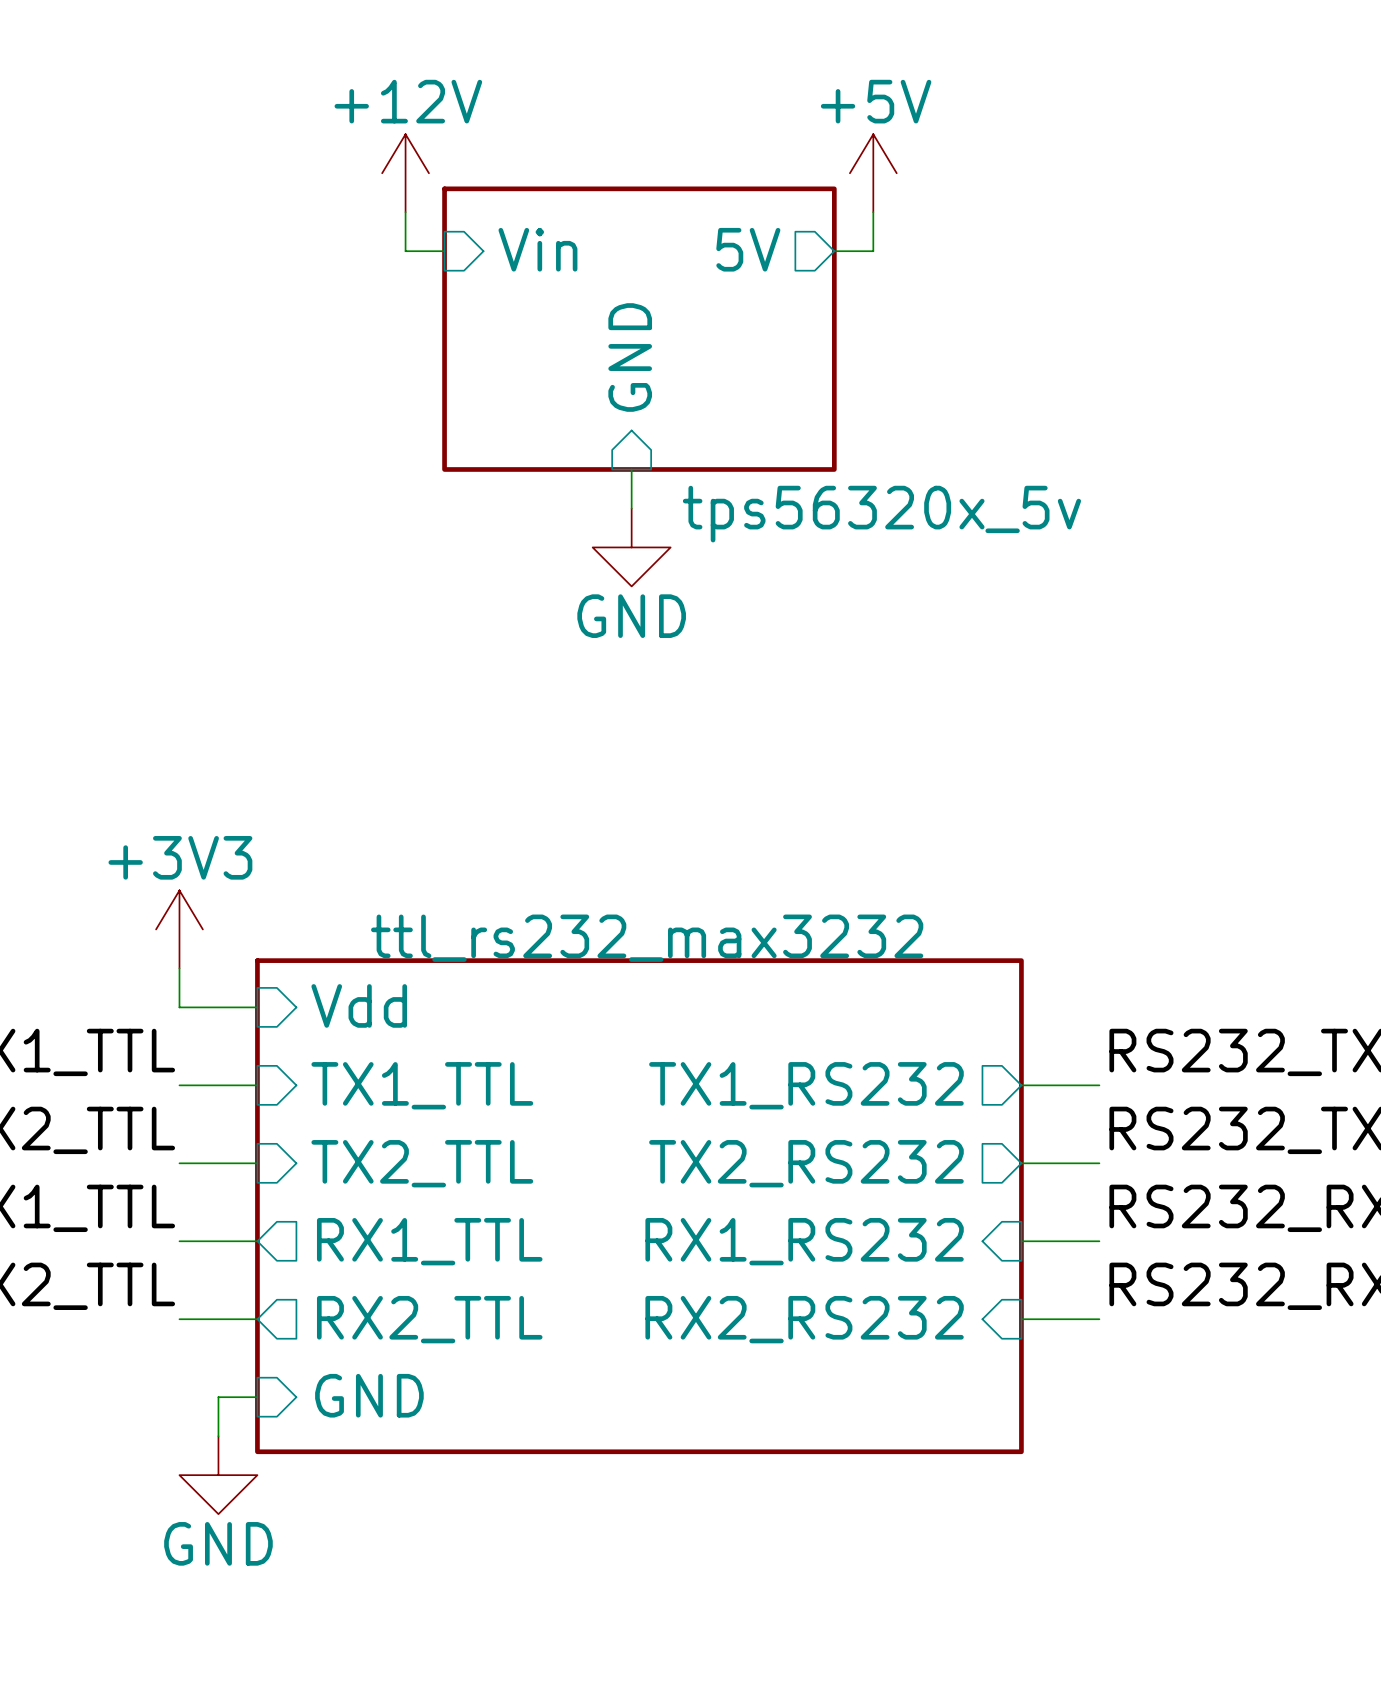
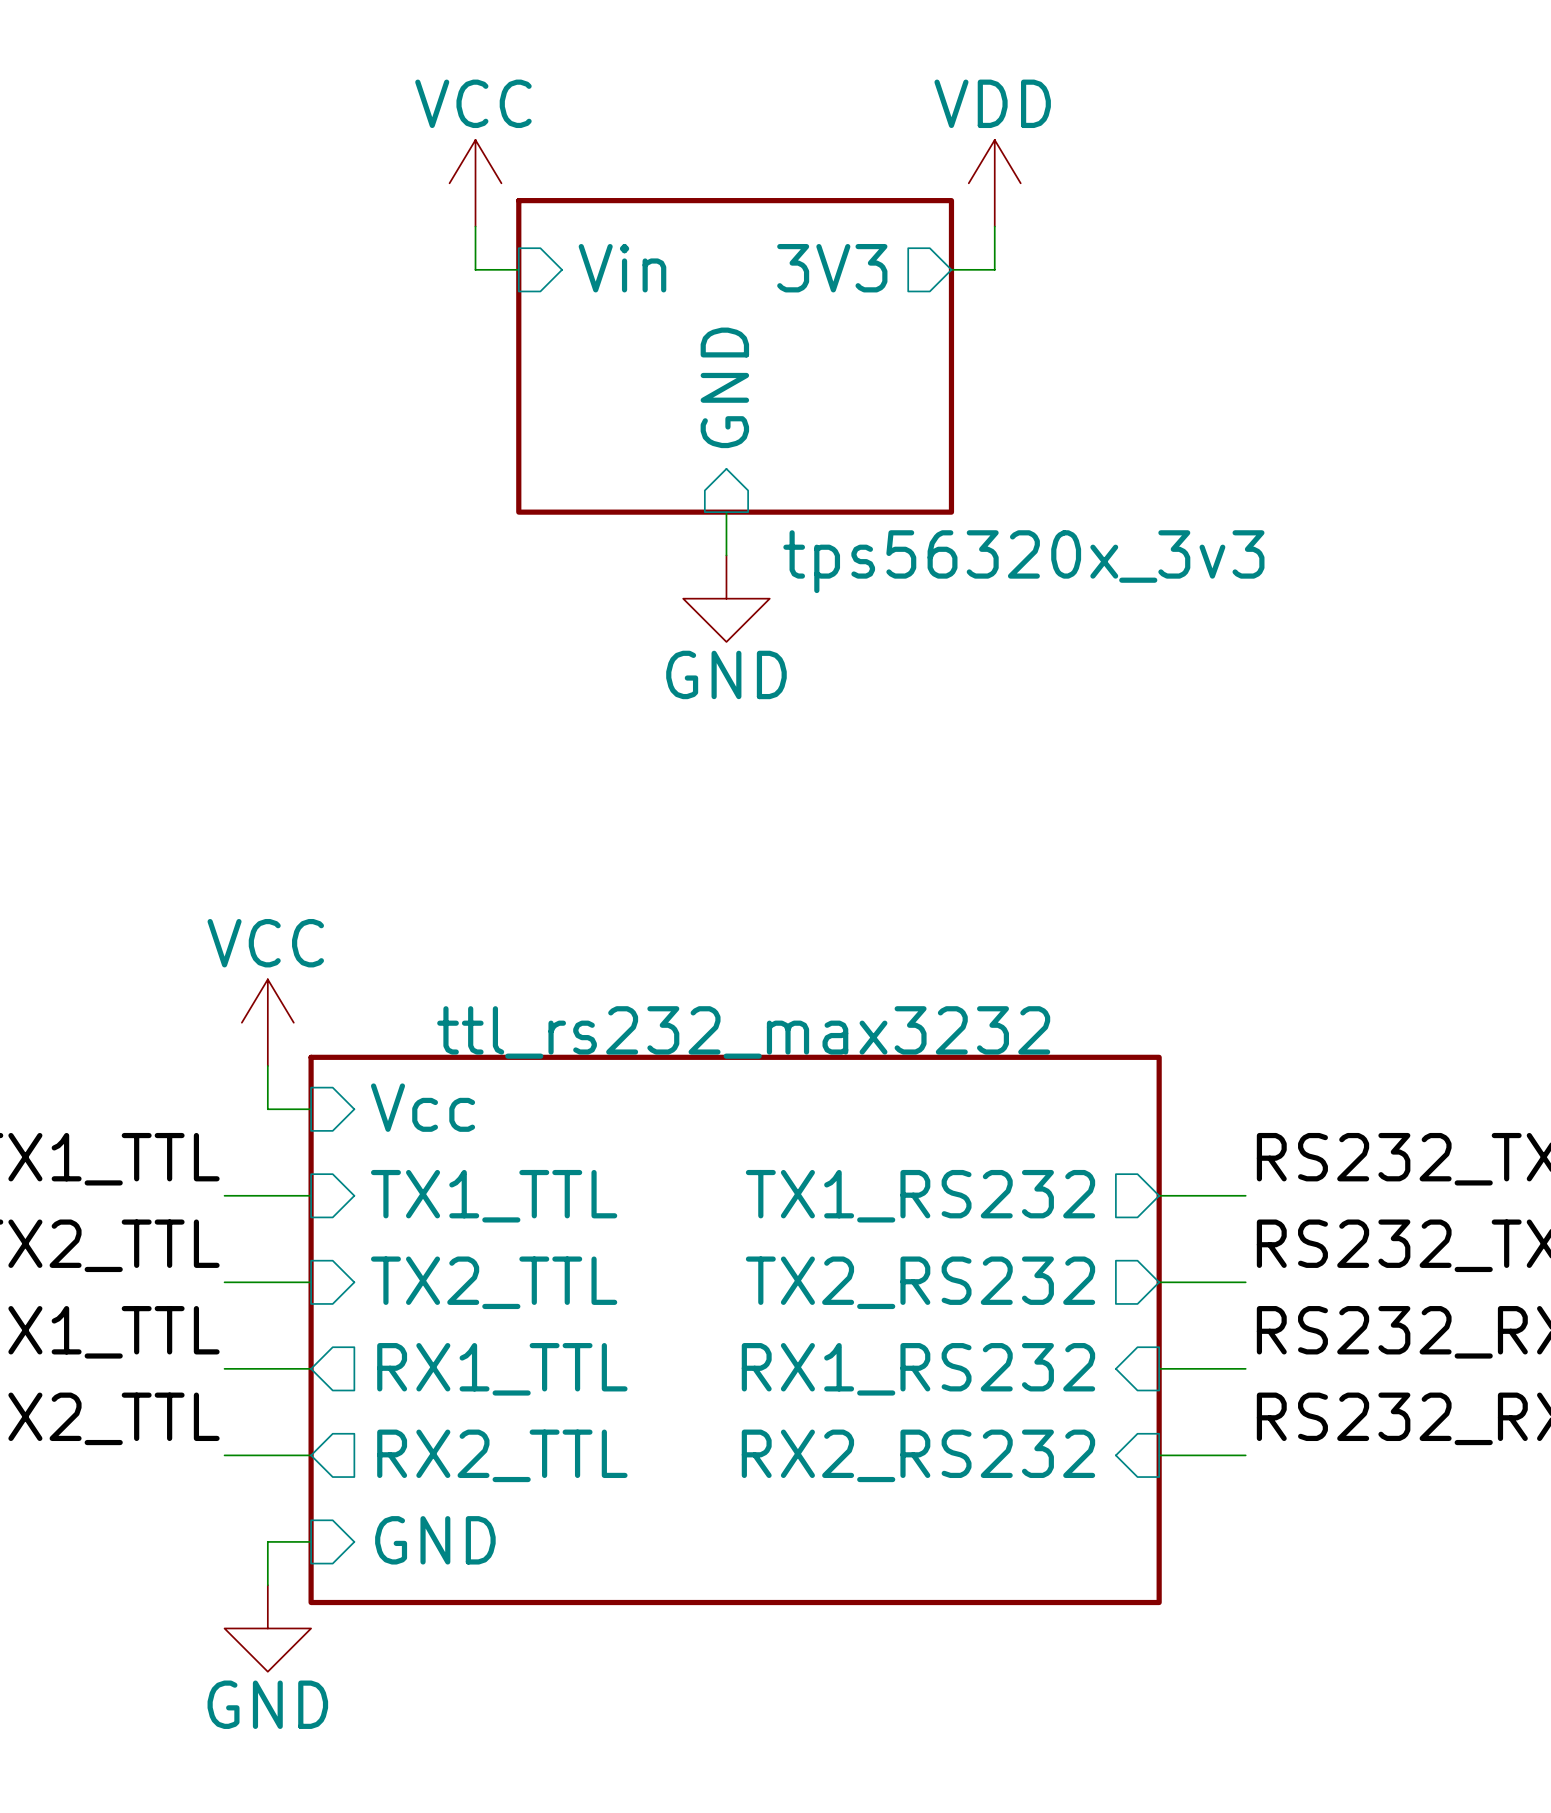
power symbol: +12V (405, 173) -> VCC (475, 183)
power symbol: +5V (873, 173) -> VDD (994, 183)
sheet pin: 5V (748, 249) -> 3V3 (832, 268)
sheet tps56320x_5v name: tps56320x_5v (881, 514) -> tps56320x_3v3 (1023, 561)
power symbol: +3V3 (179, 929) -> none
power symbol: none -> VCC (267, 1022)
wire: (179, 968) (179, 1007) (218, 1007) -> (267, 1065) (267, 1109)
sheet pin: Vdd (359, 1005) -> Vcc (423, 1107)

